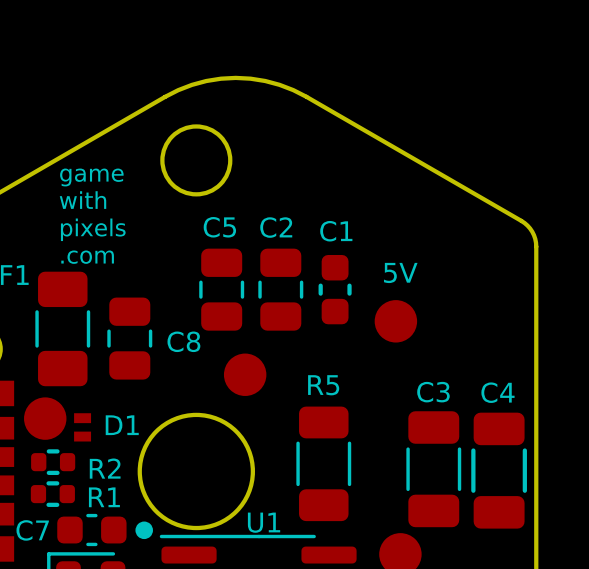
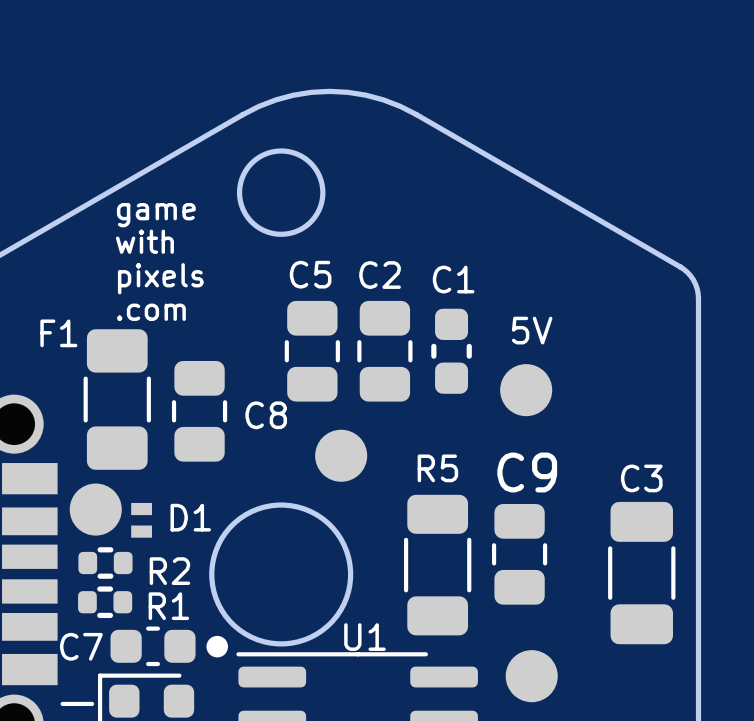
C9: none -> (519, 554)
C3 position: (433, 469) -> (641, 573)
C4: (499, 470) -> none

